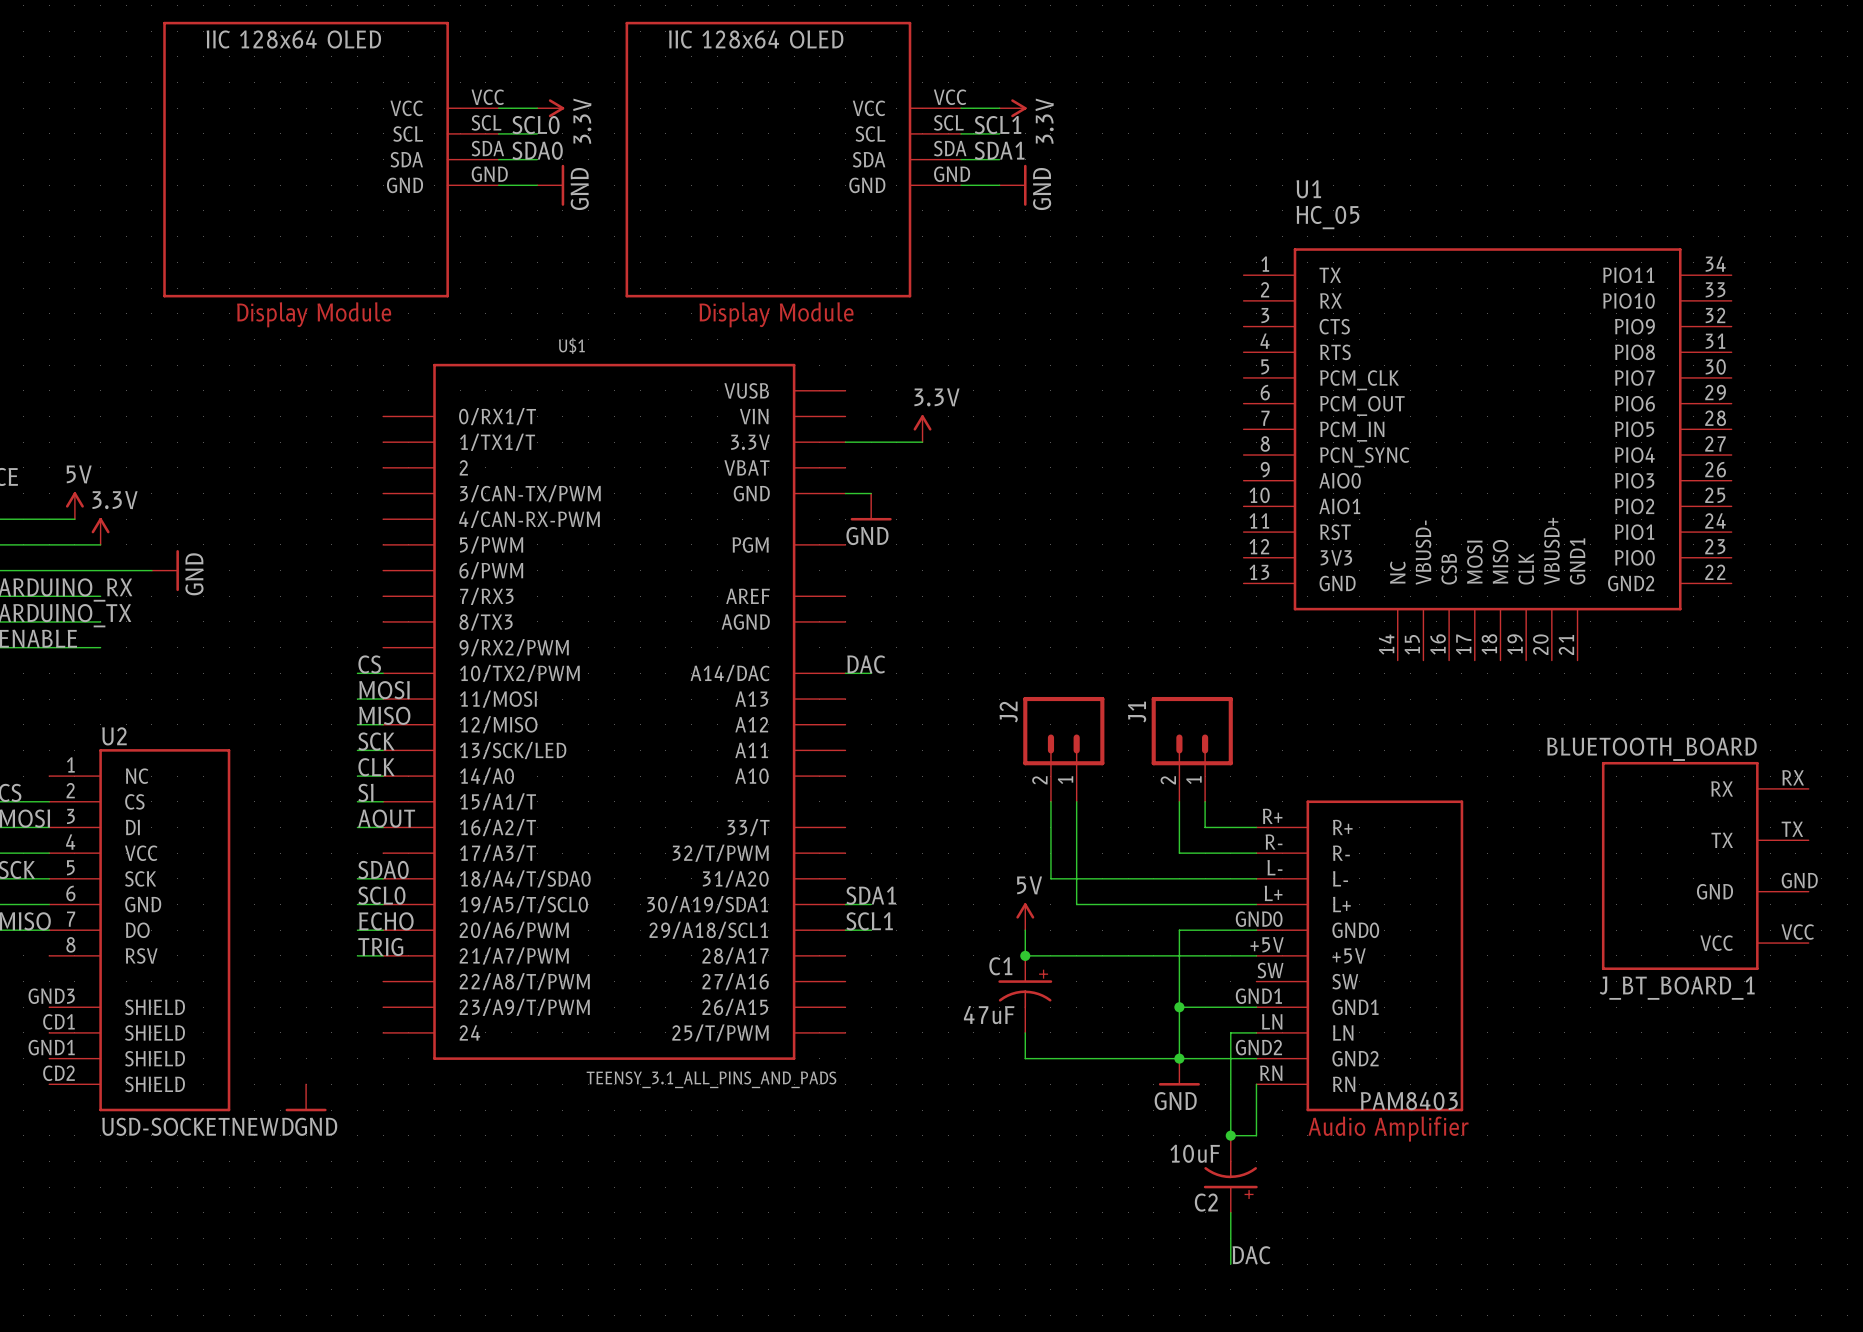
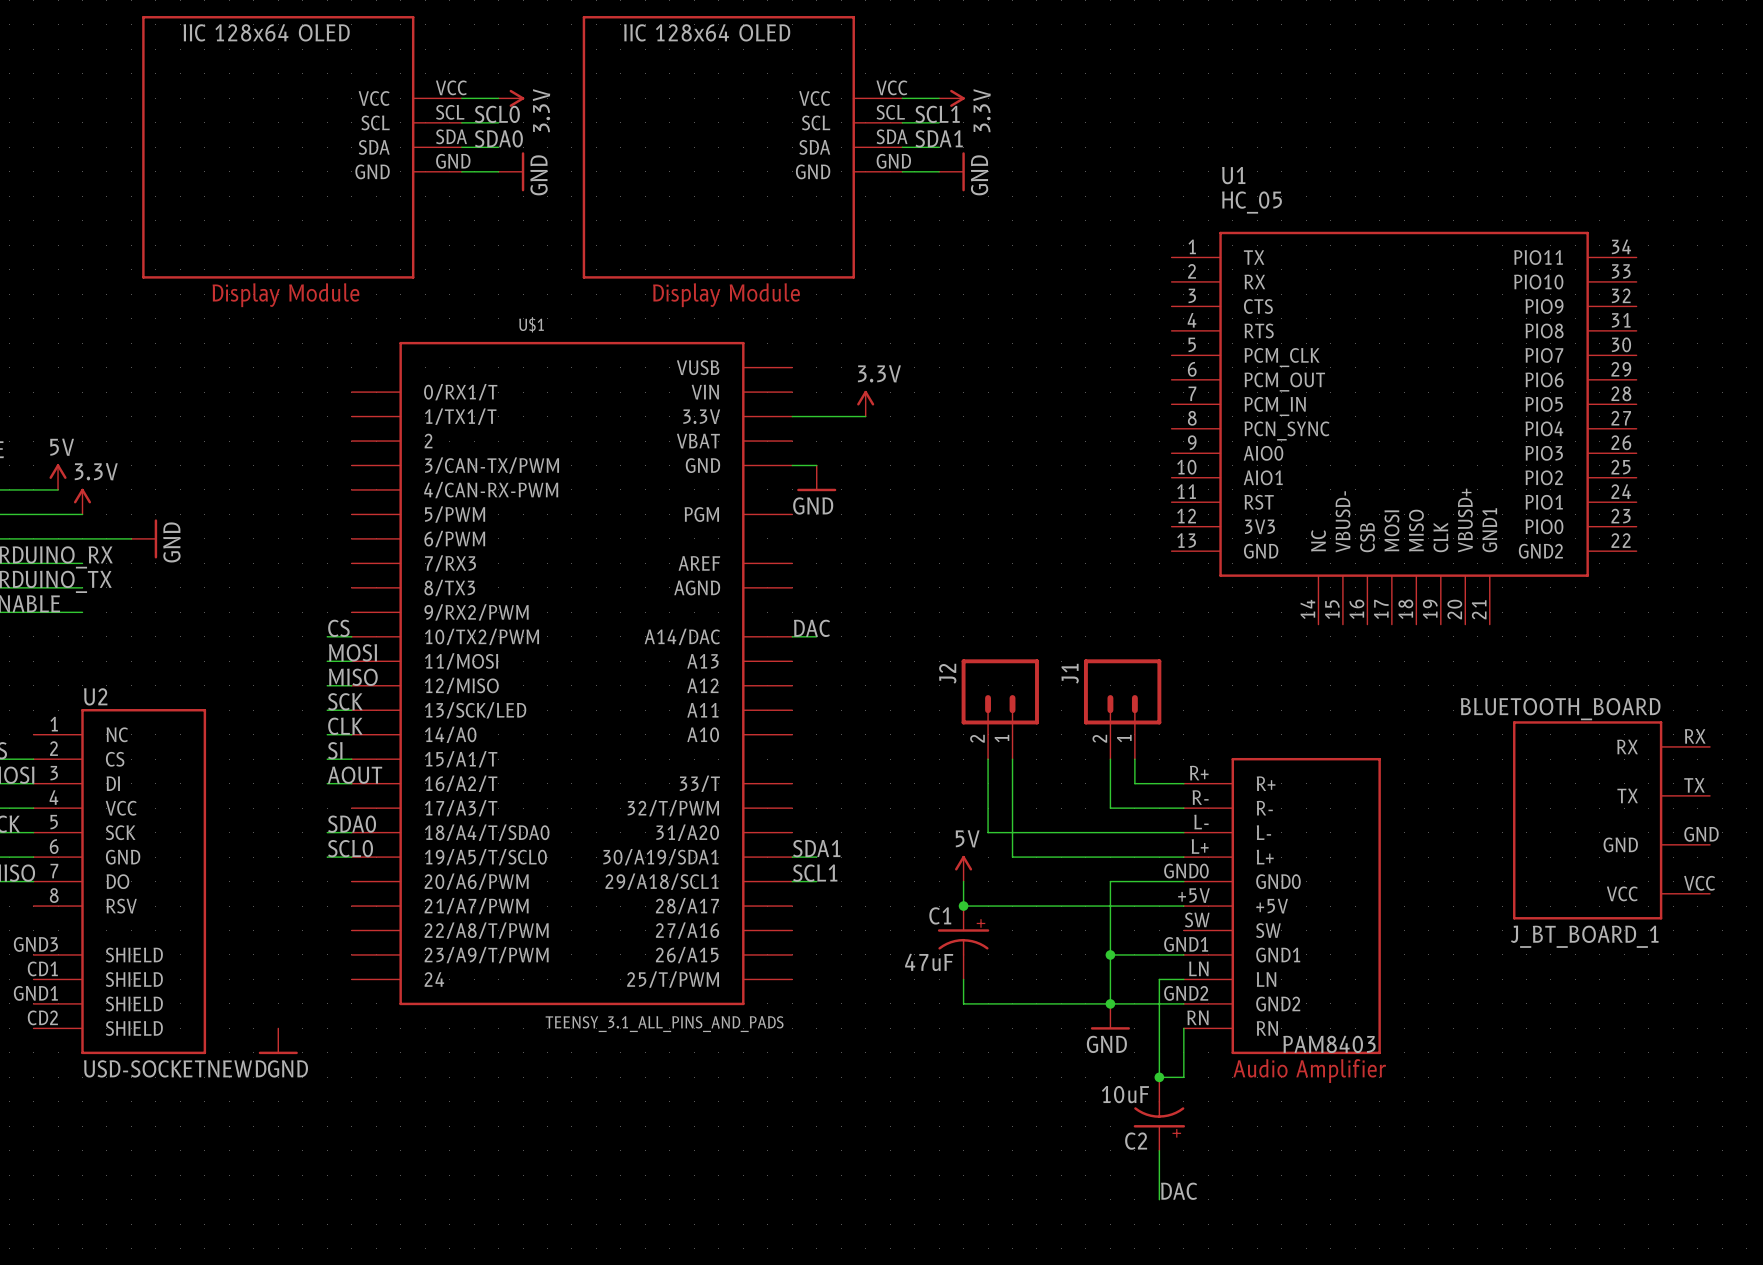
label: ECHO (386, 921) -> none
wire: (357, 930) (383, 930) -> none
label: TRIG (380, 946) -> none
wire: (357, 955) (383, 955) -> none

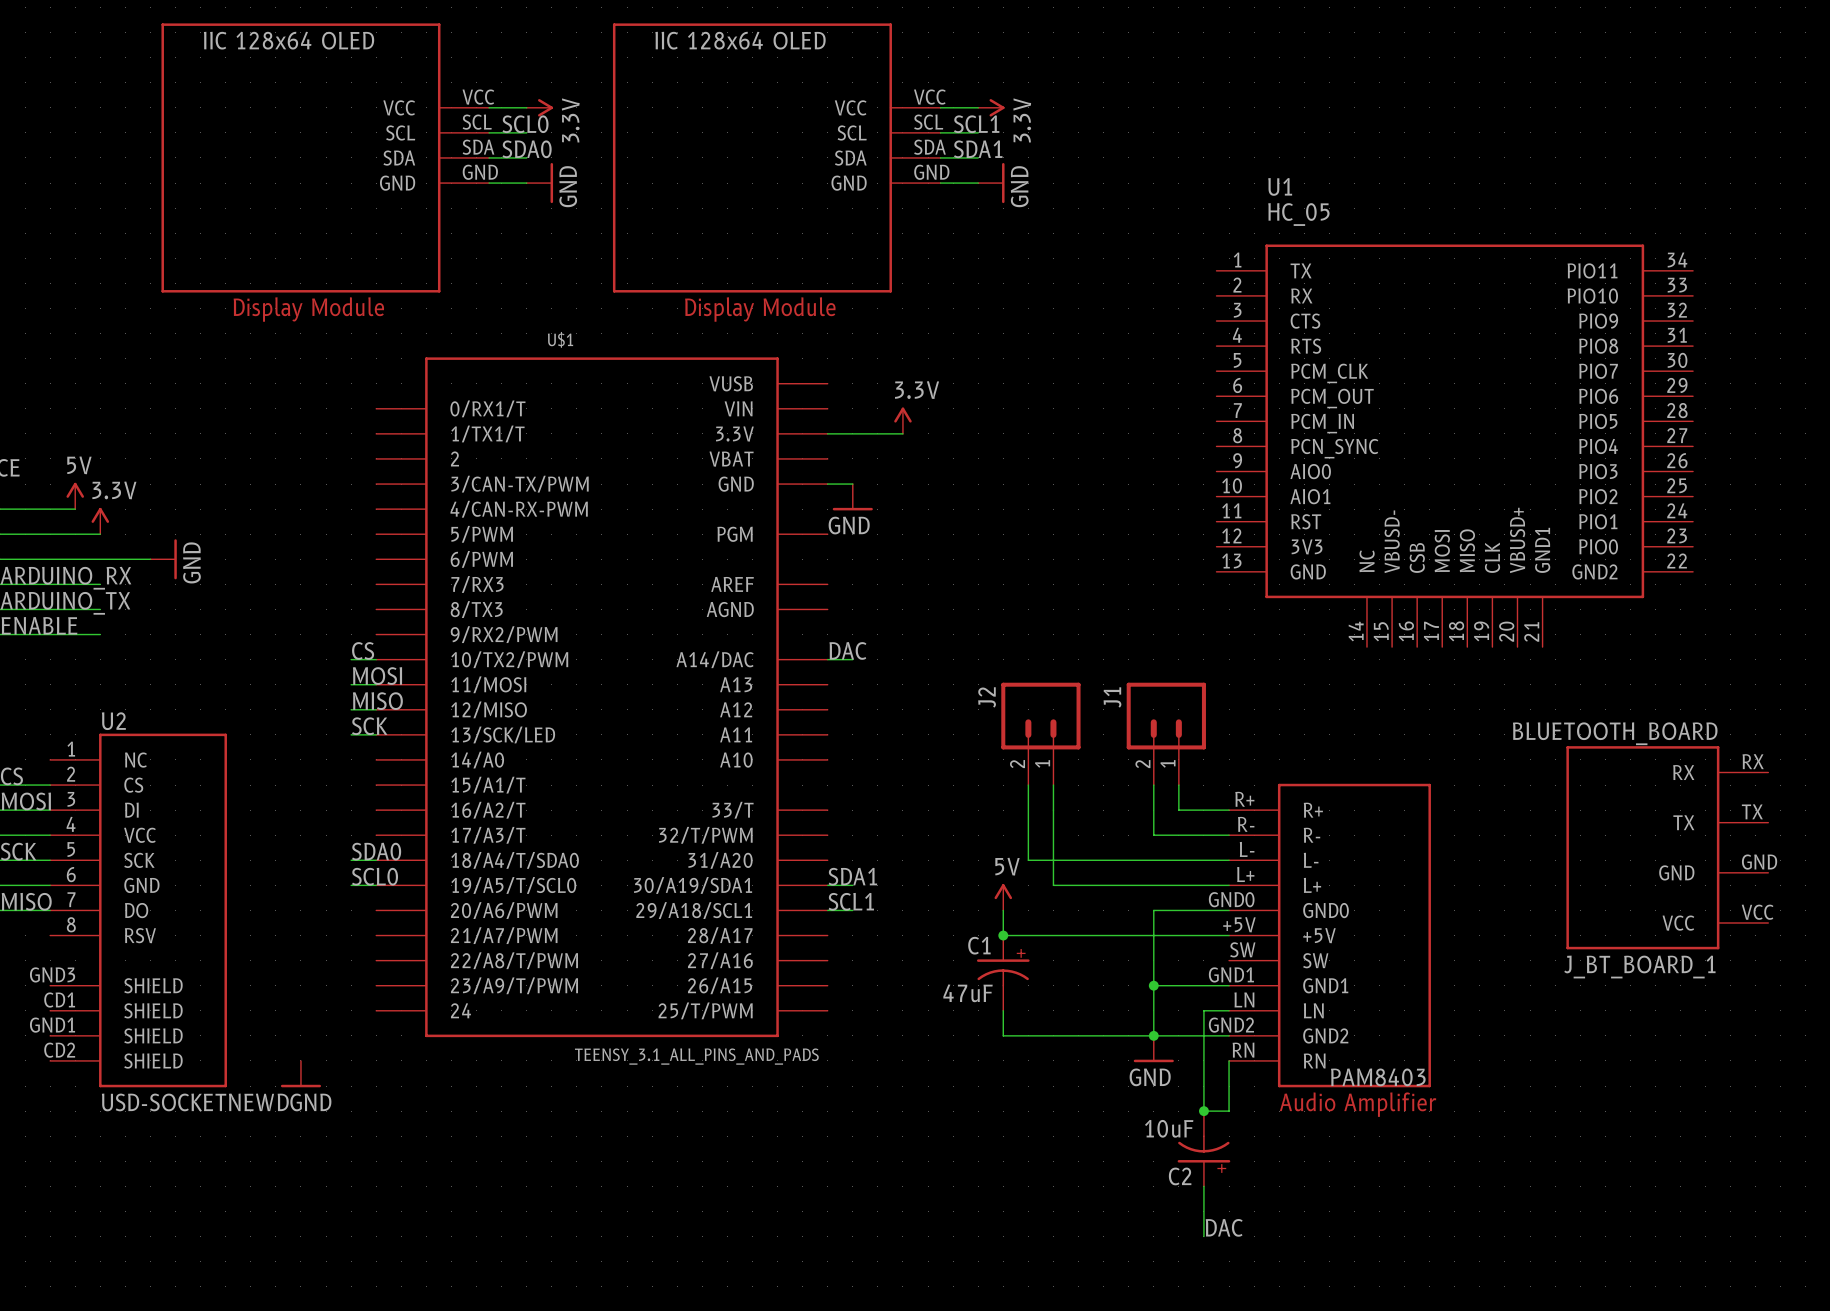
label: CLK (345, 726) -> none
wire: (327, 734) (351, 734) -> none
label: SI (335, 750) -> none
wire: (327, 759) (351, 759) -> none
label: AOUT (355, 775) -> none
wire: (327, 783) (351, 783) -> none

